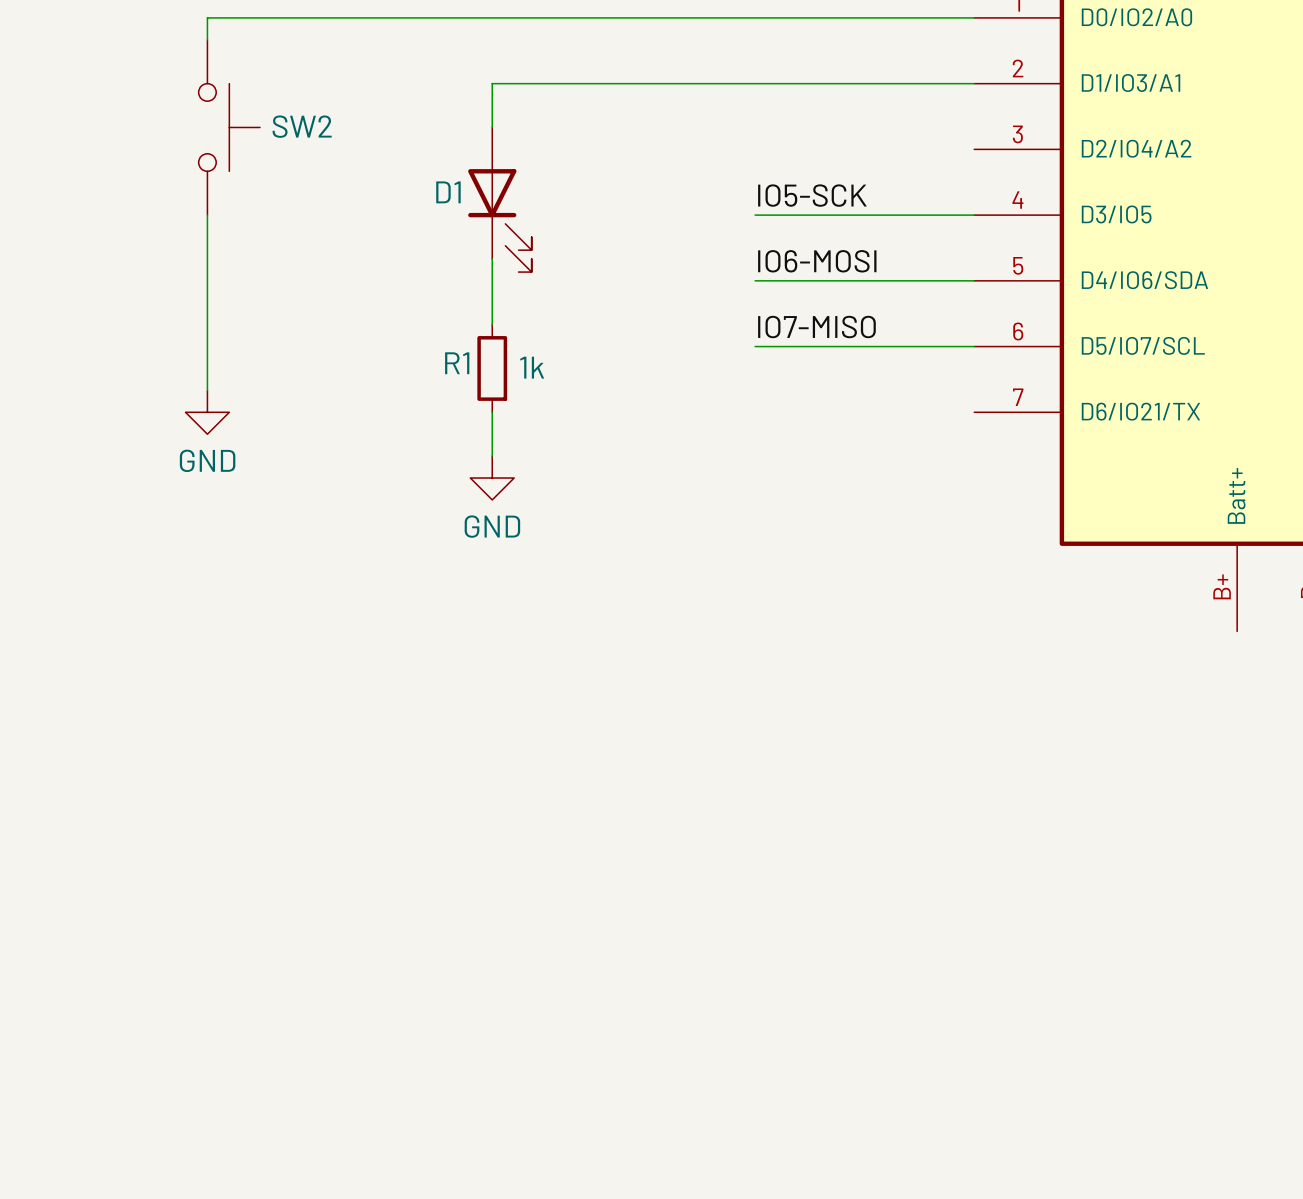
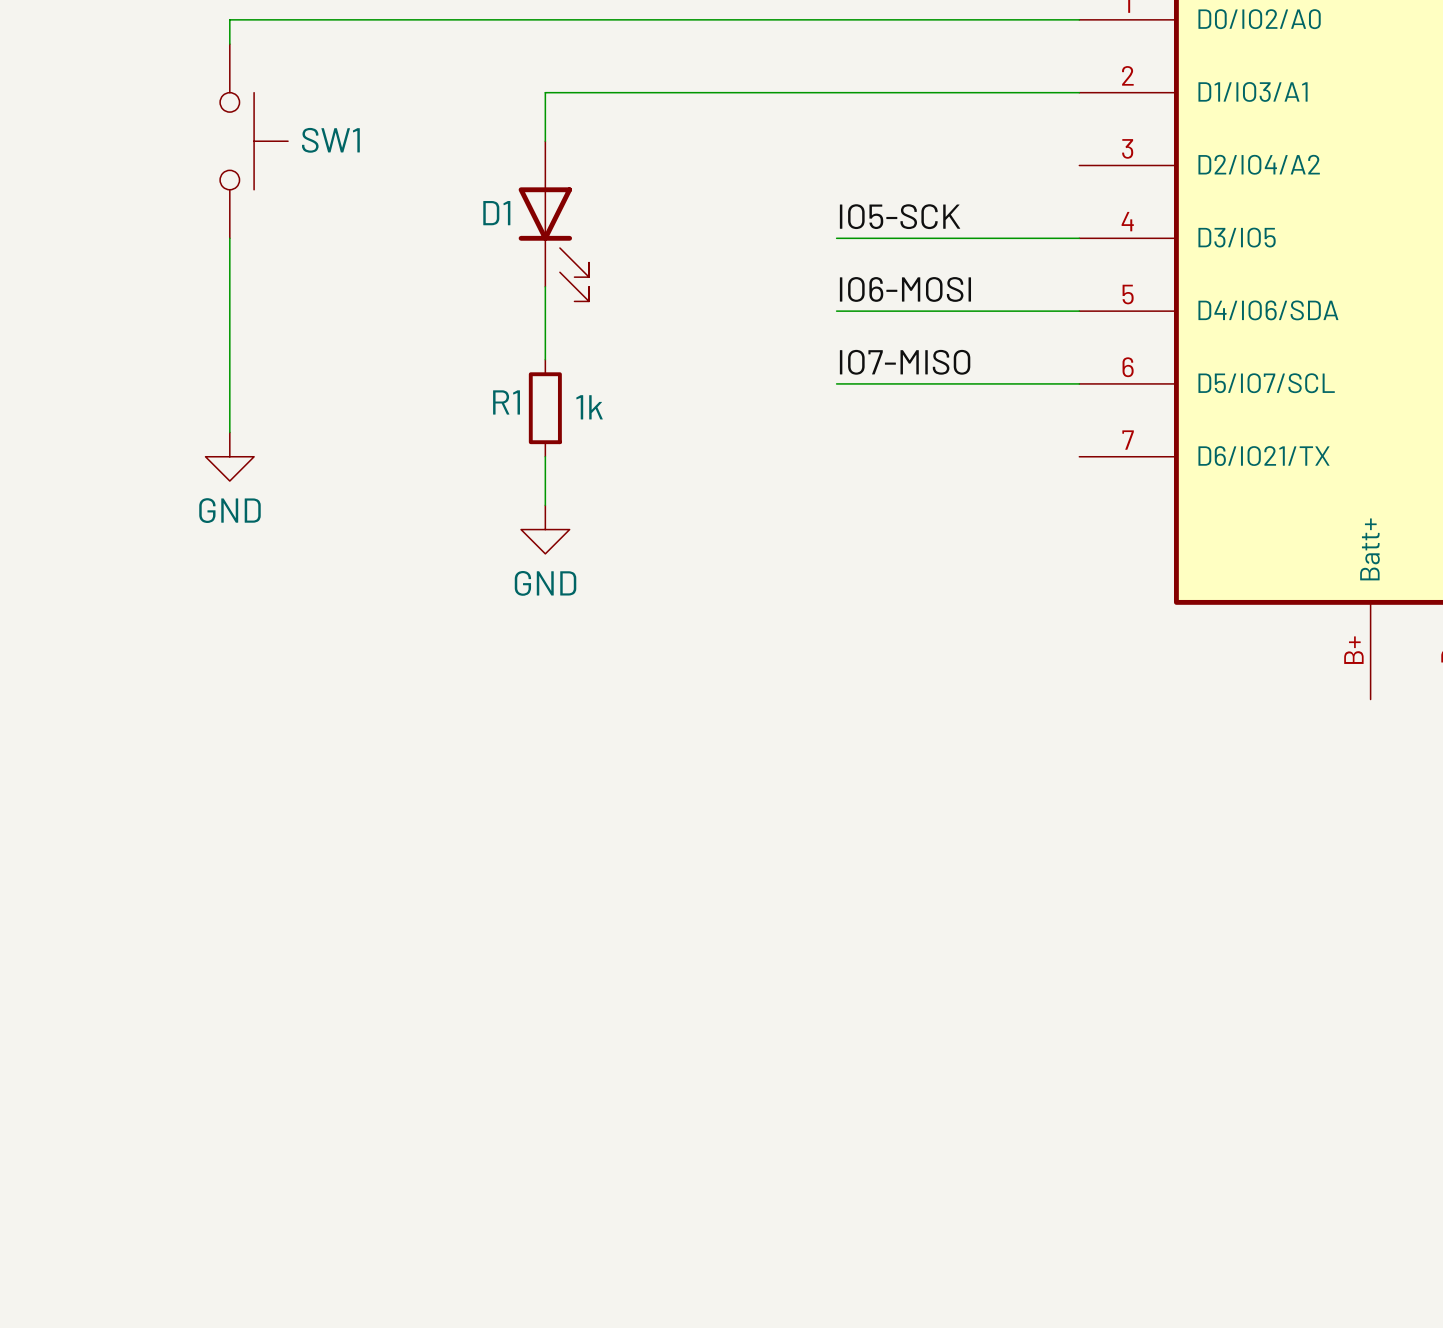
SW2 name: SW2 (302, 126) -> SW1 (330, 140)

